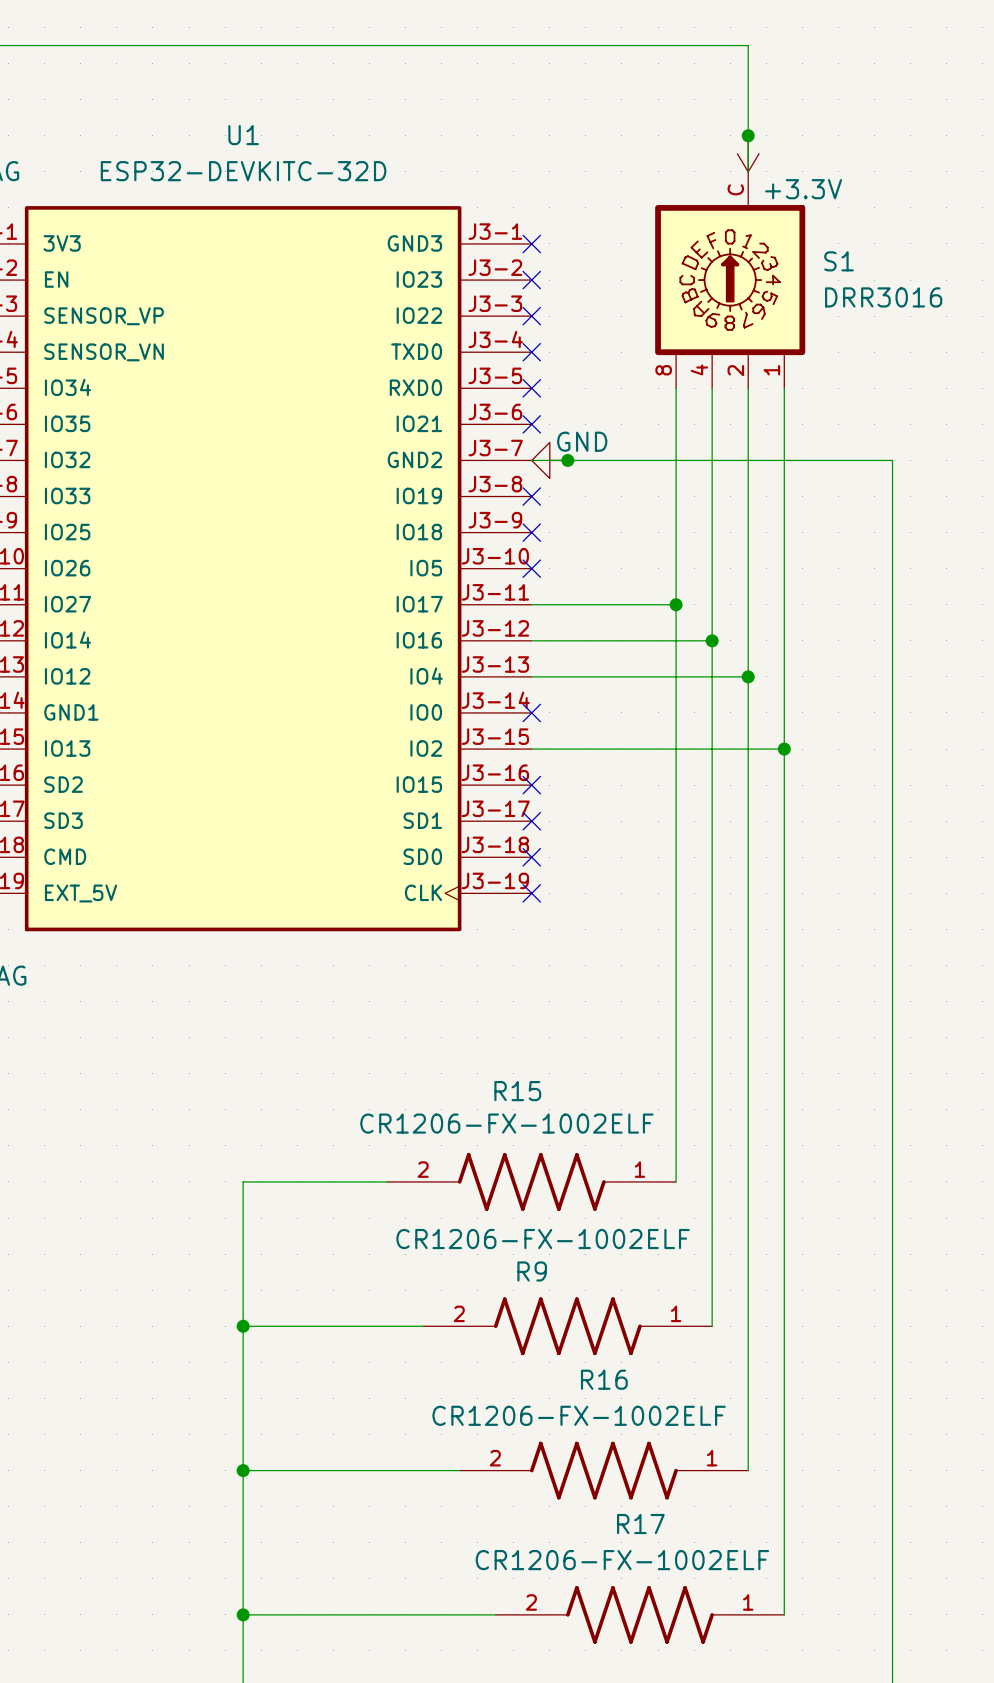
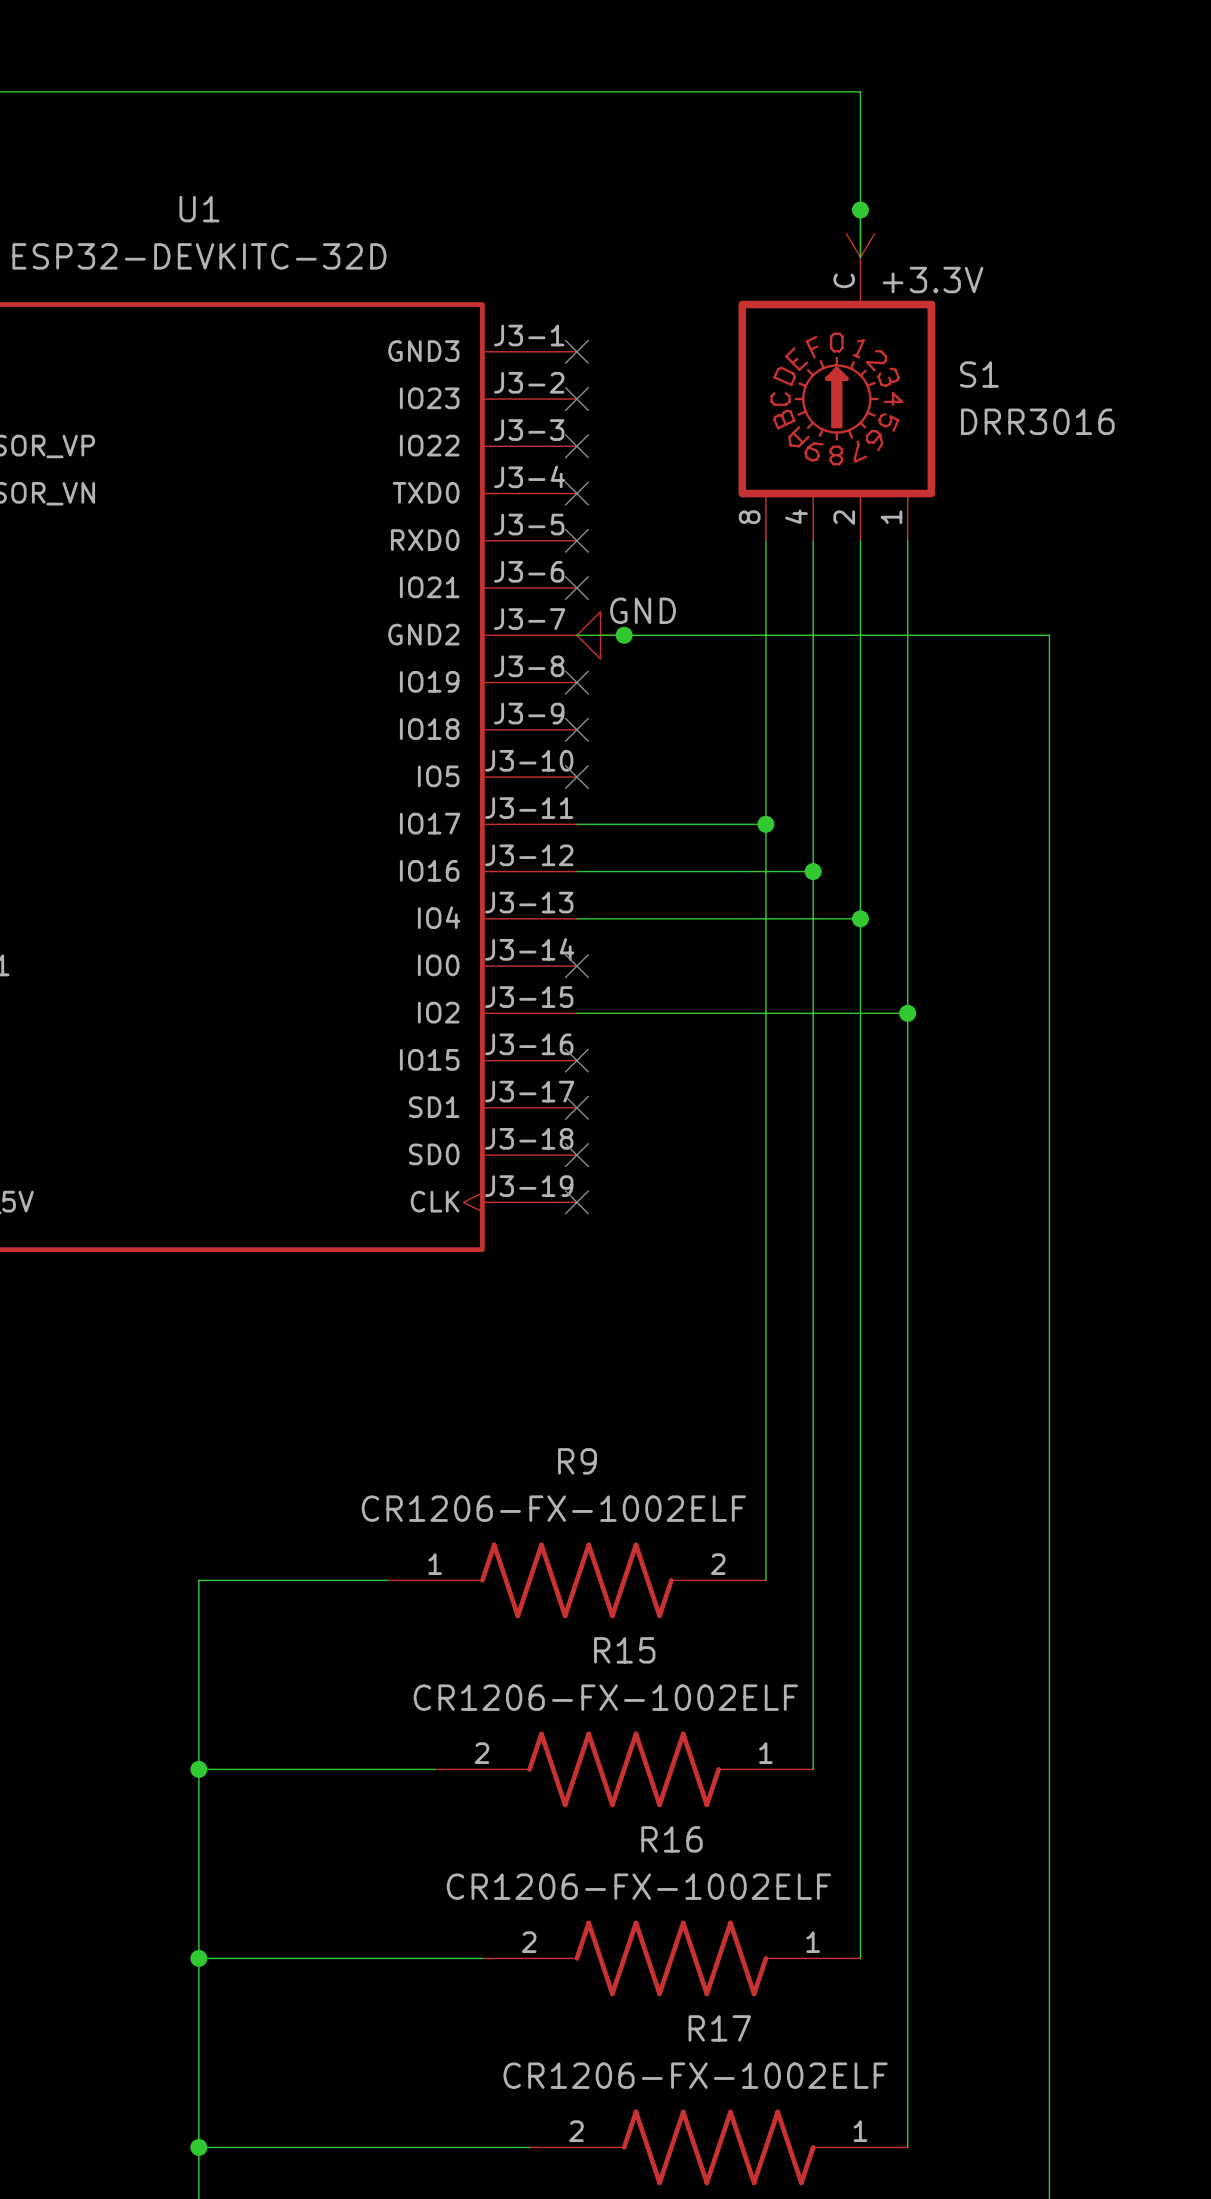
R15 name position: R15 (517, 1091) -> R15 (624, 1650)
R9 rotation: 0° (531, 1181) -> 180° (576, 1580)
R15 value position: CR1206-FX-1002ELF (543, 1239) -> CR1206-FX-1002ELF (605, 1697)

